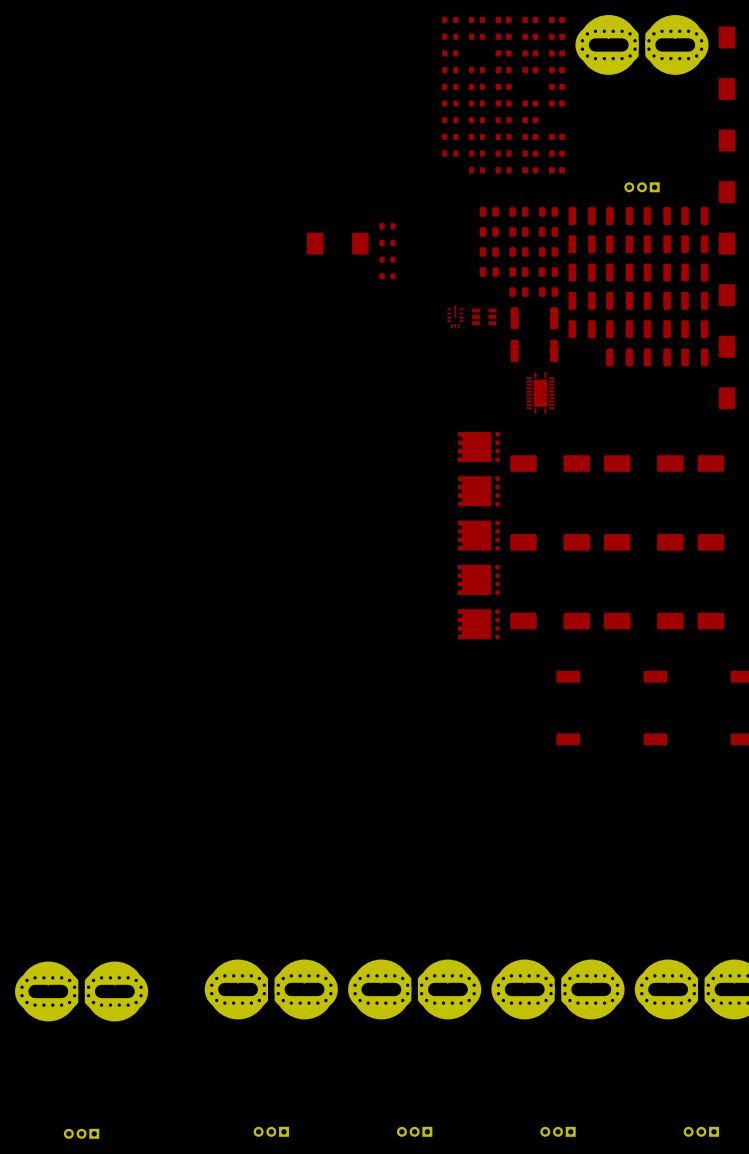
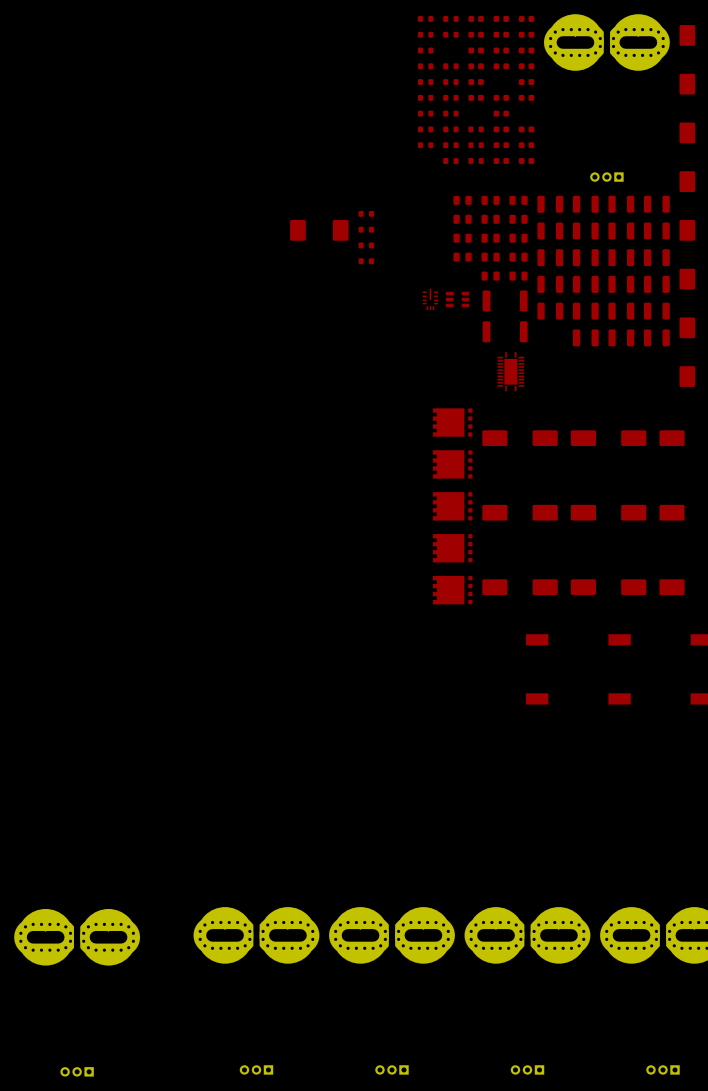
part: (503, 120) -> none

